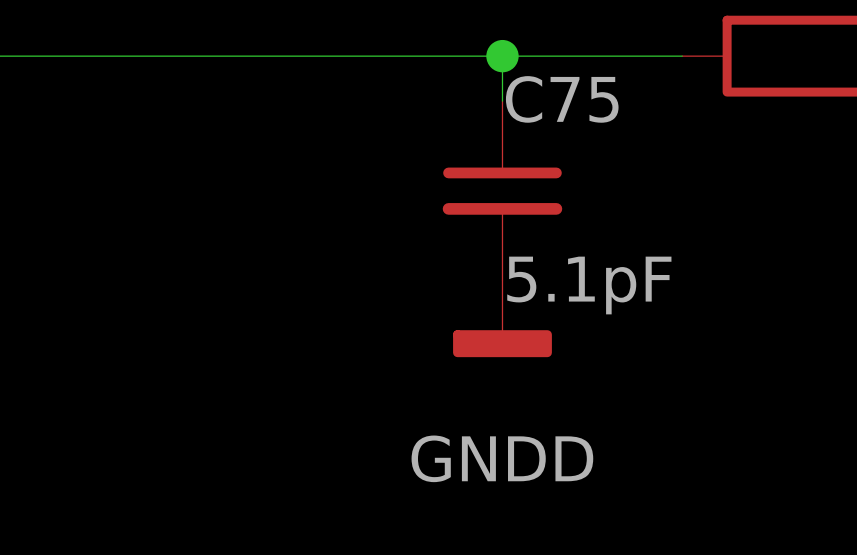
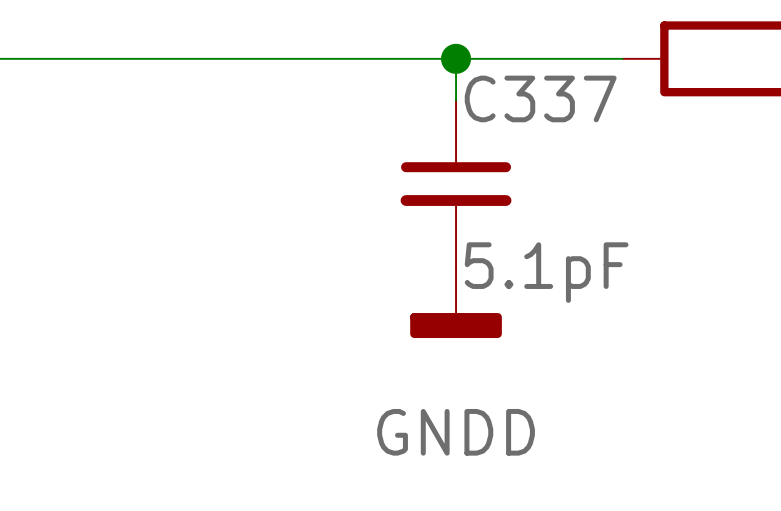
C75 name: C75 (562, 99) -> C337 (540, 98)

